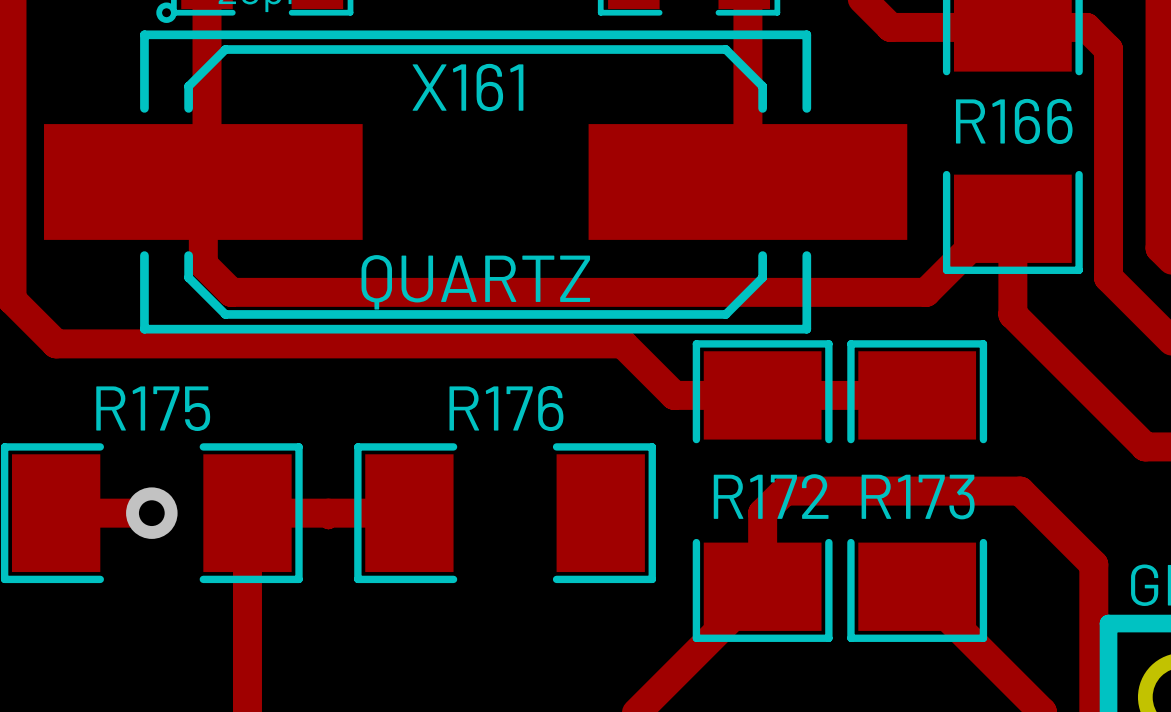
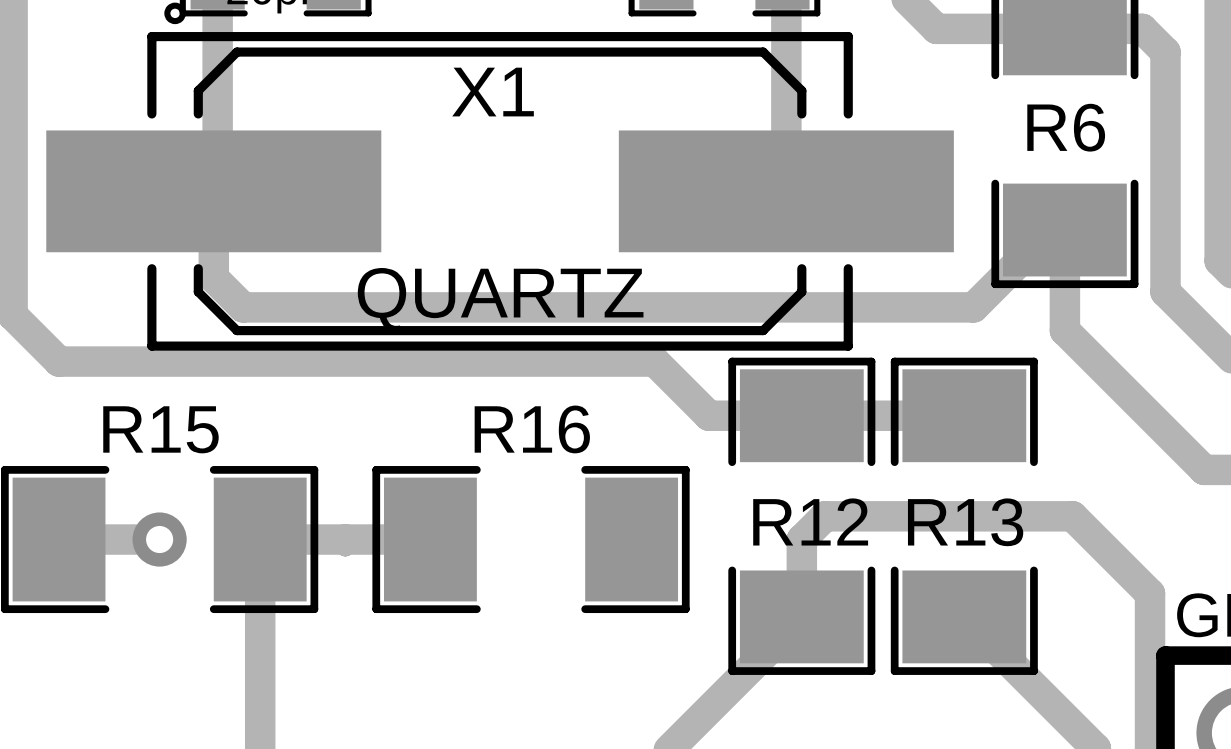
X161 name: X161 (467, 87) -> X1 (493, 92)
R166 name: R166 (1014, 121) -> R6 (1066, 127)
R175 name: R175 (153, 408) -> R15 (160, 429)
R176 name: R176 (506, 408) -> R16 (532, 429)
R172 name: R172 (771, 496) -> R12 (810, 521)
R173 name: R173 (918, 497) -> R13 (965, 522)

